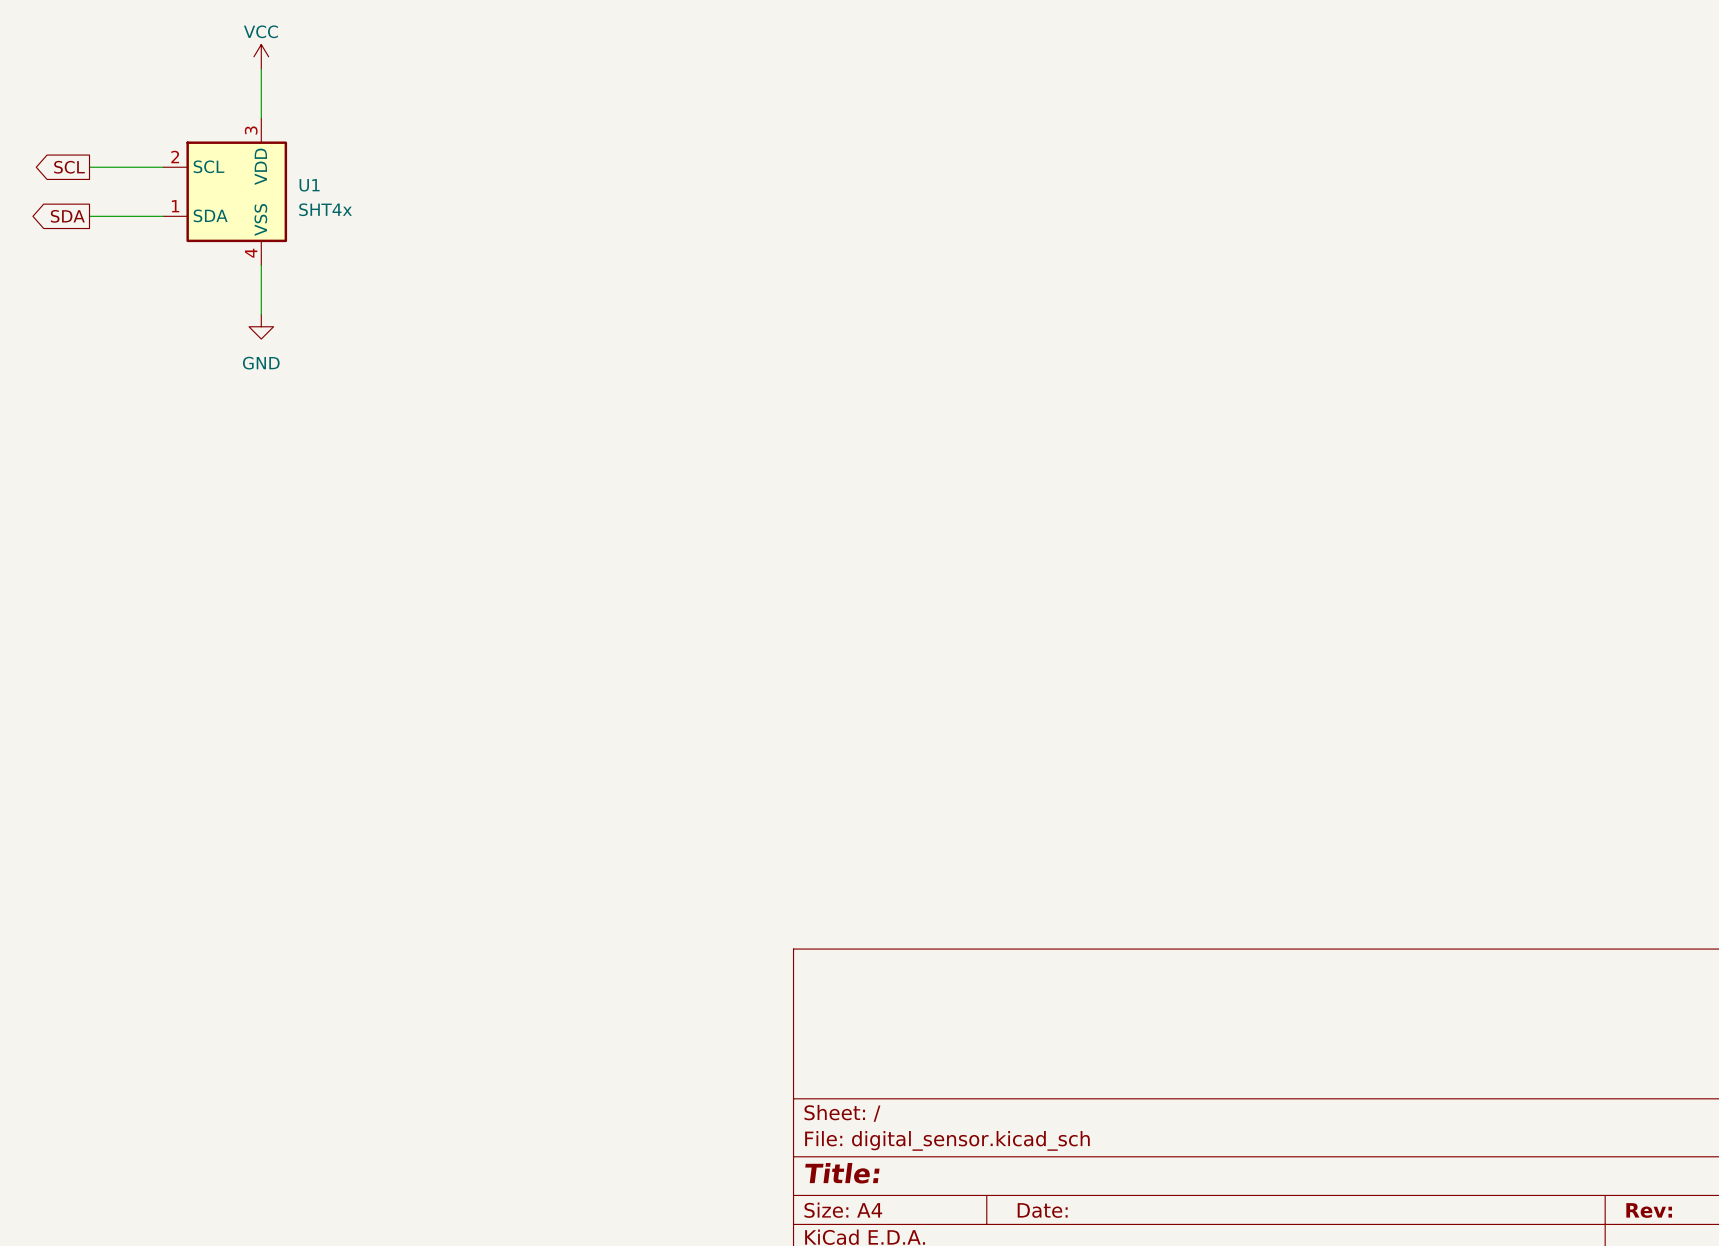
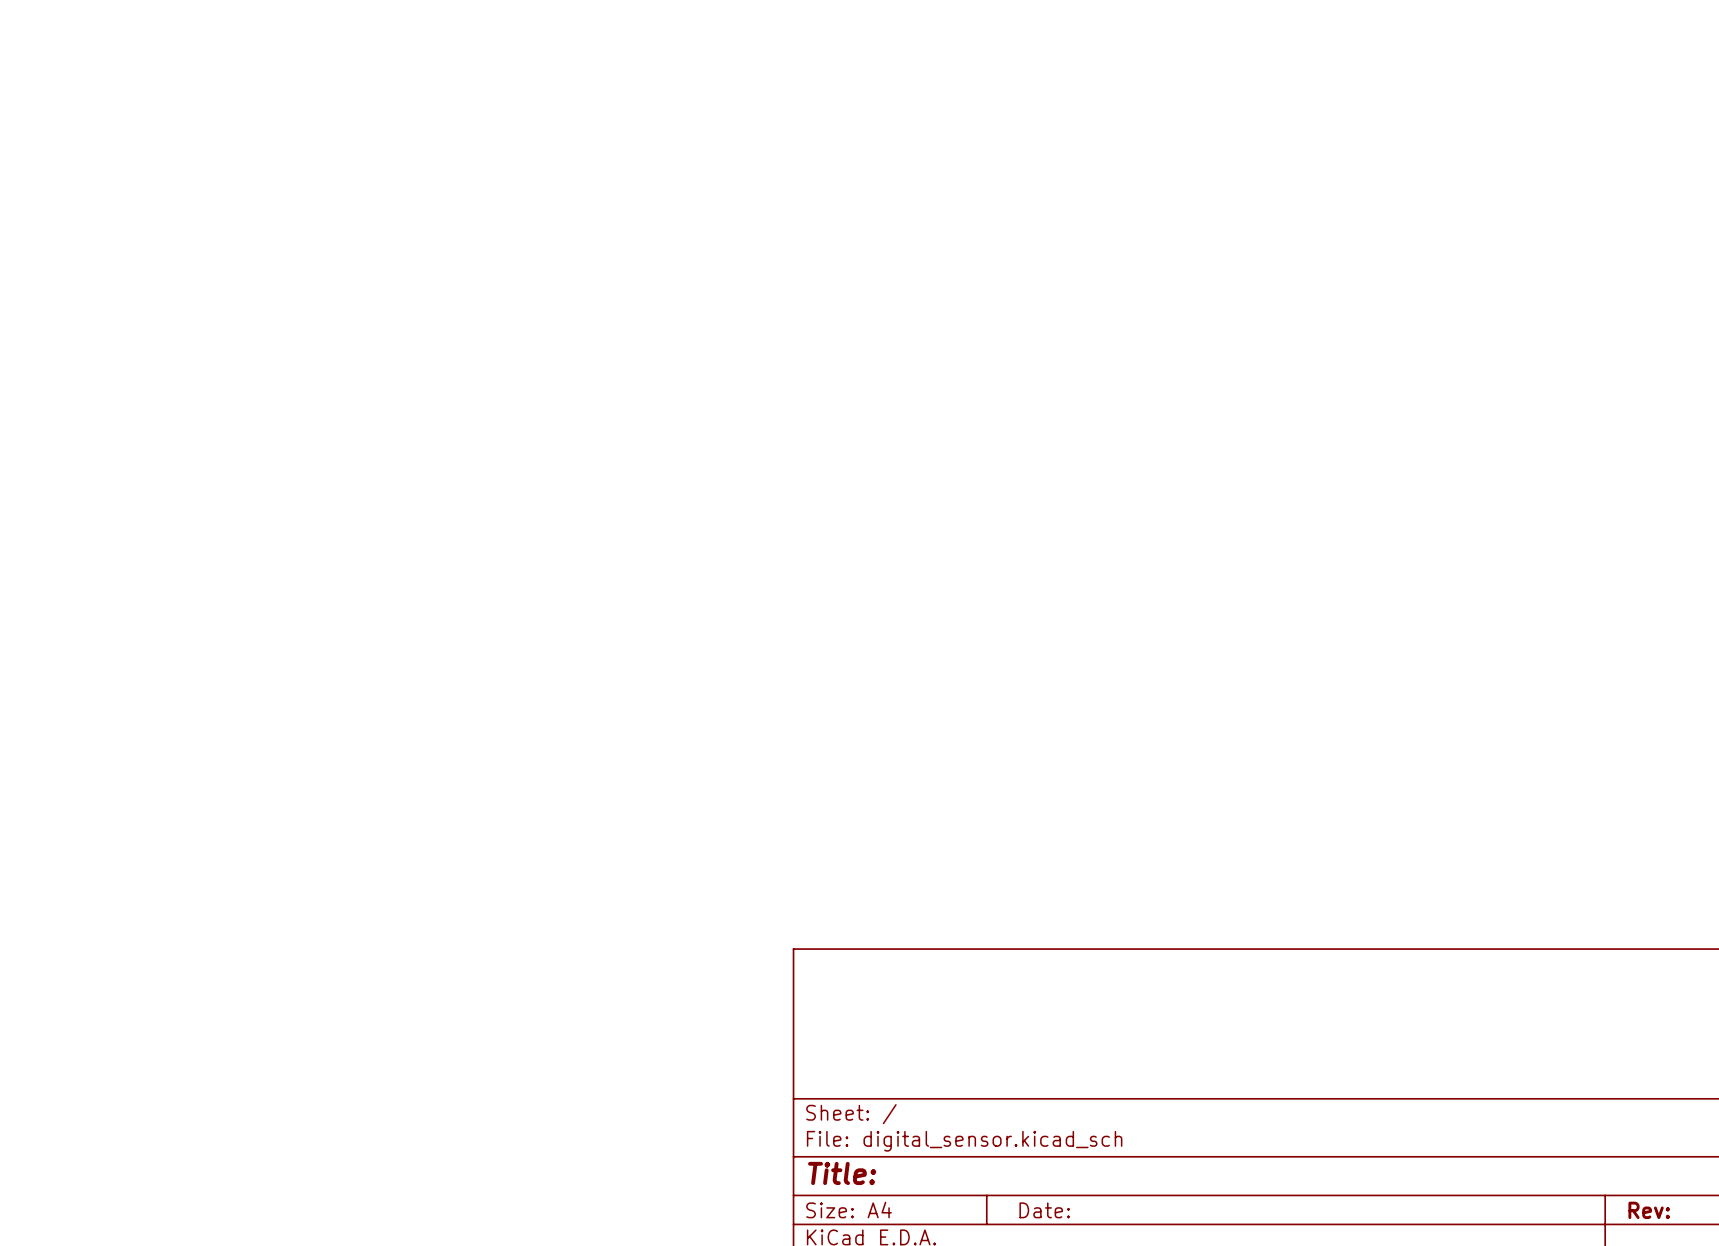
power symbol: VCC (261, 56) -> none
wire: (261, 69) (261, 118) -> none
global label: SCL (69, 167) -> none
wire: (89, 167) (163, 167) -> none
U1: SHT4x (225, 191) -> none
global label: SDA (67, 216) -> none
wire: (89, 216) (163, 216) -> none
wire: (261, 265) (261, 314) -> none
power symbol: GND (261, 326) -> none

